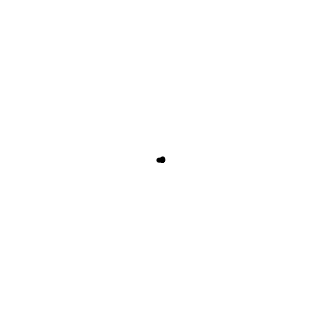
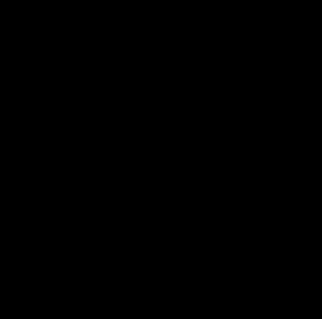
board edge: (162, 158) (158, 160) -> none

